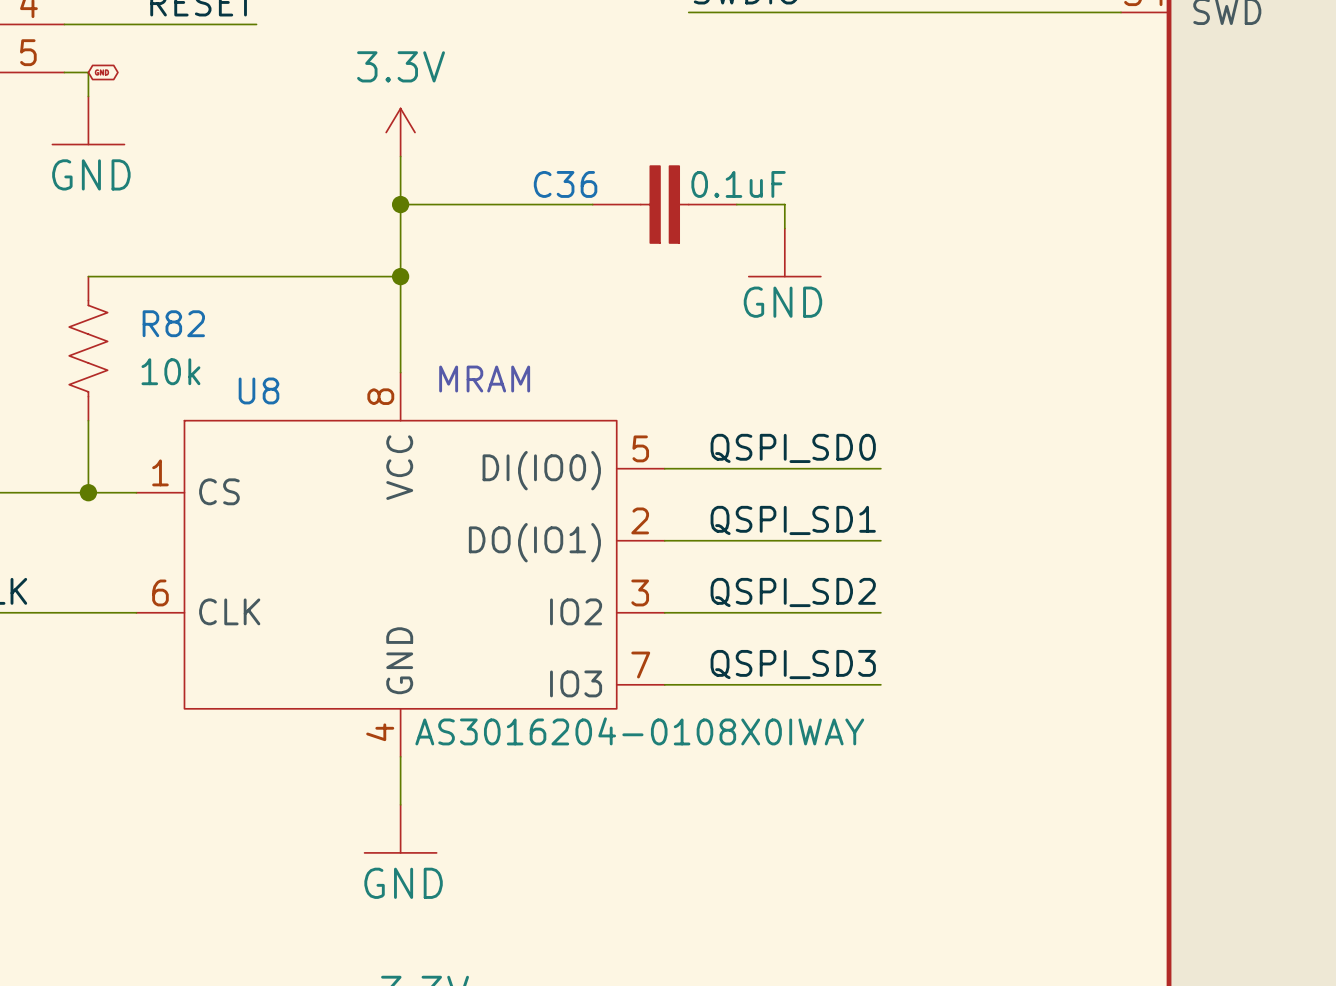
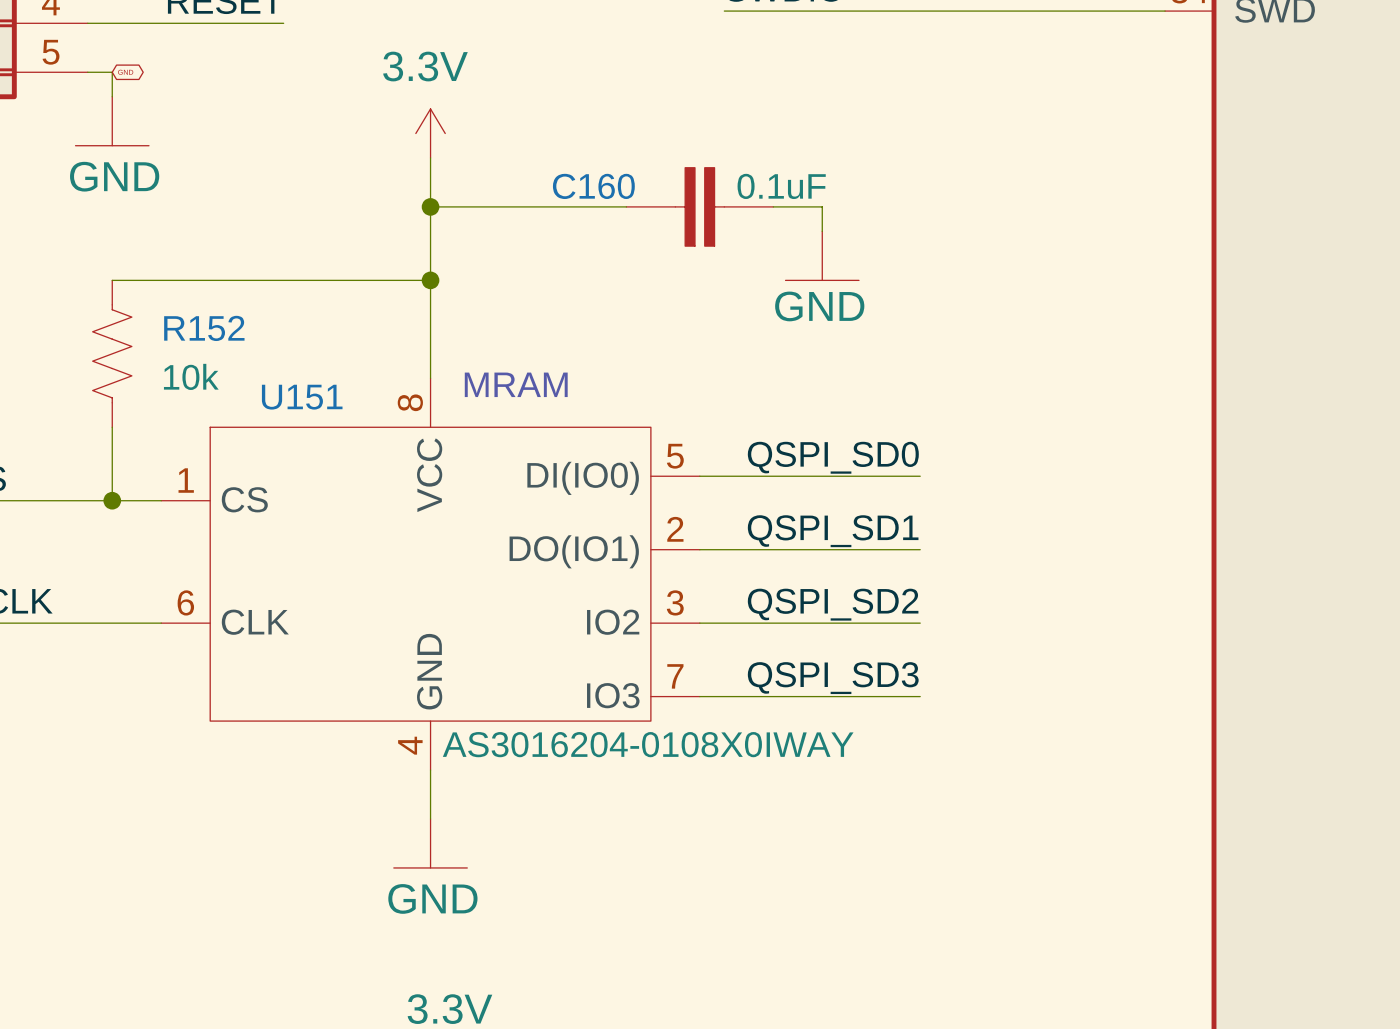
C36 name: C36 (565, 184) -> C160 (593, 186)
R82 name: R82 (173, 323) -> R152 (204, 328)
U8 name: U8 (258, 390) -> U151 (302, 397)

